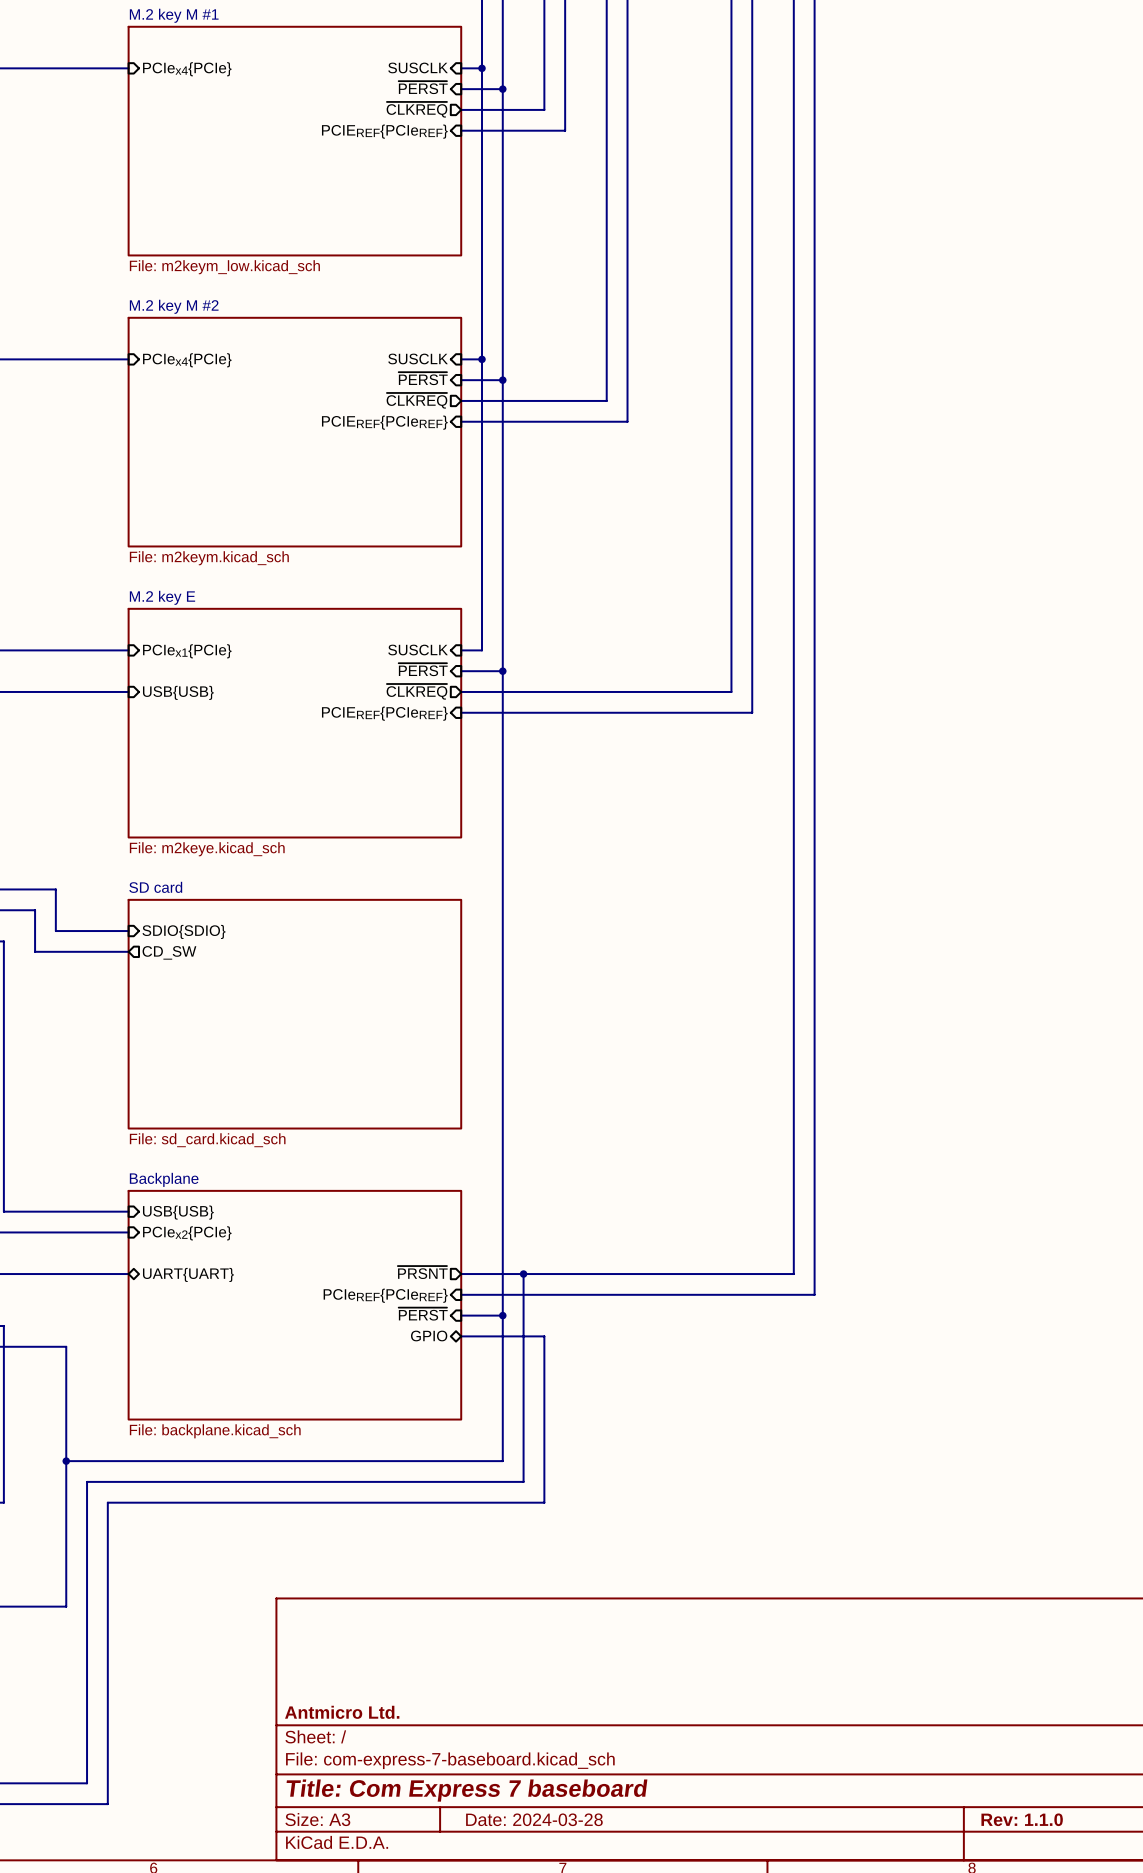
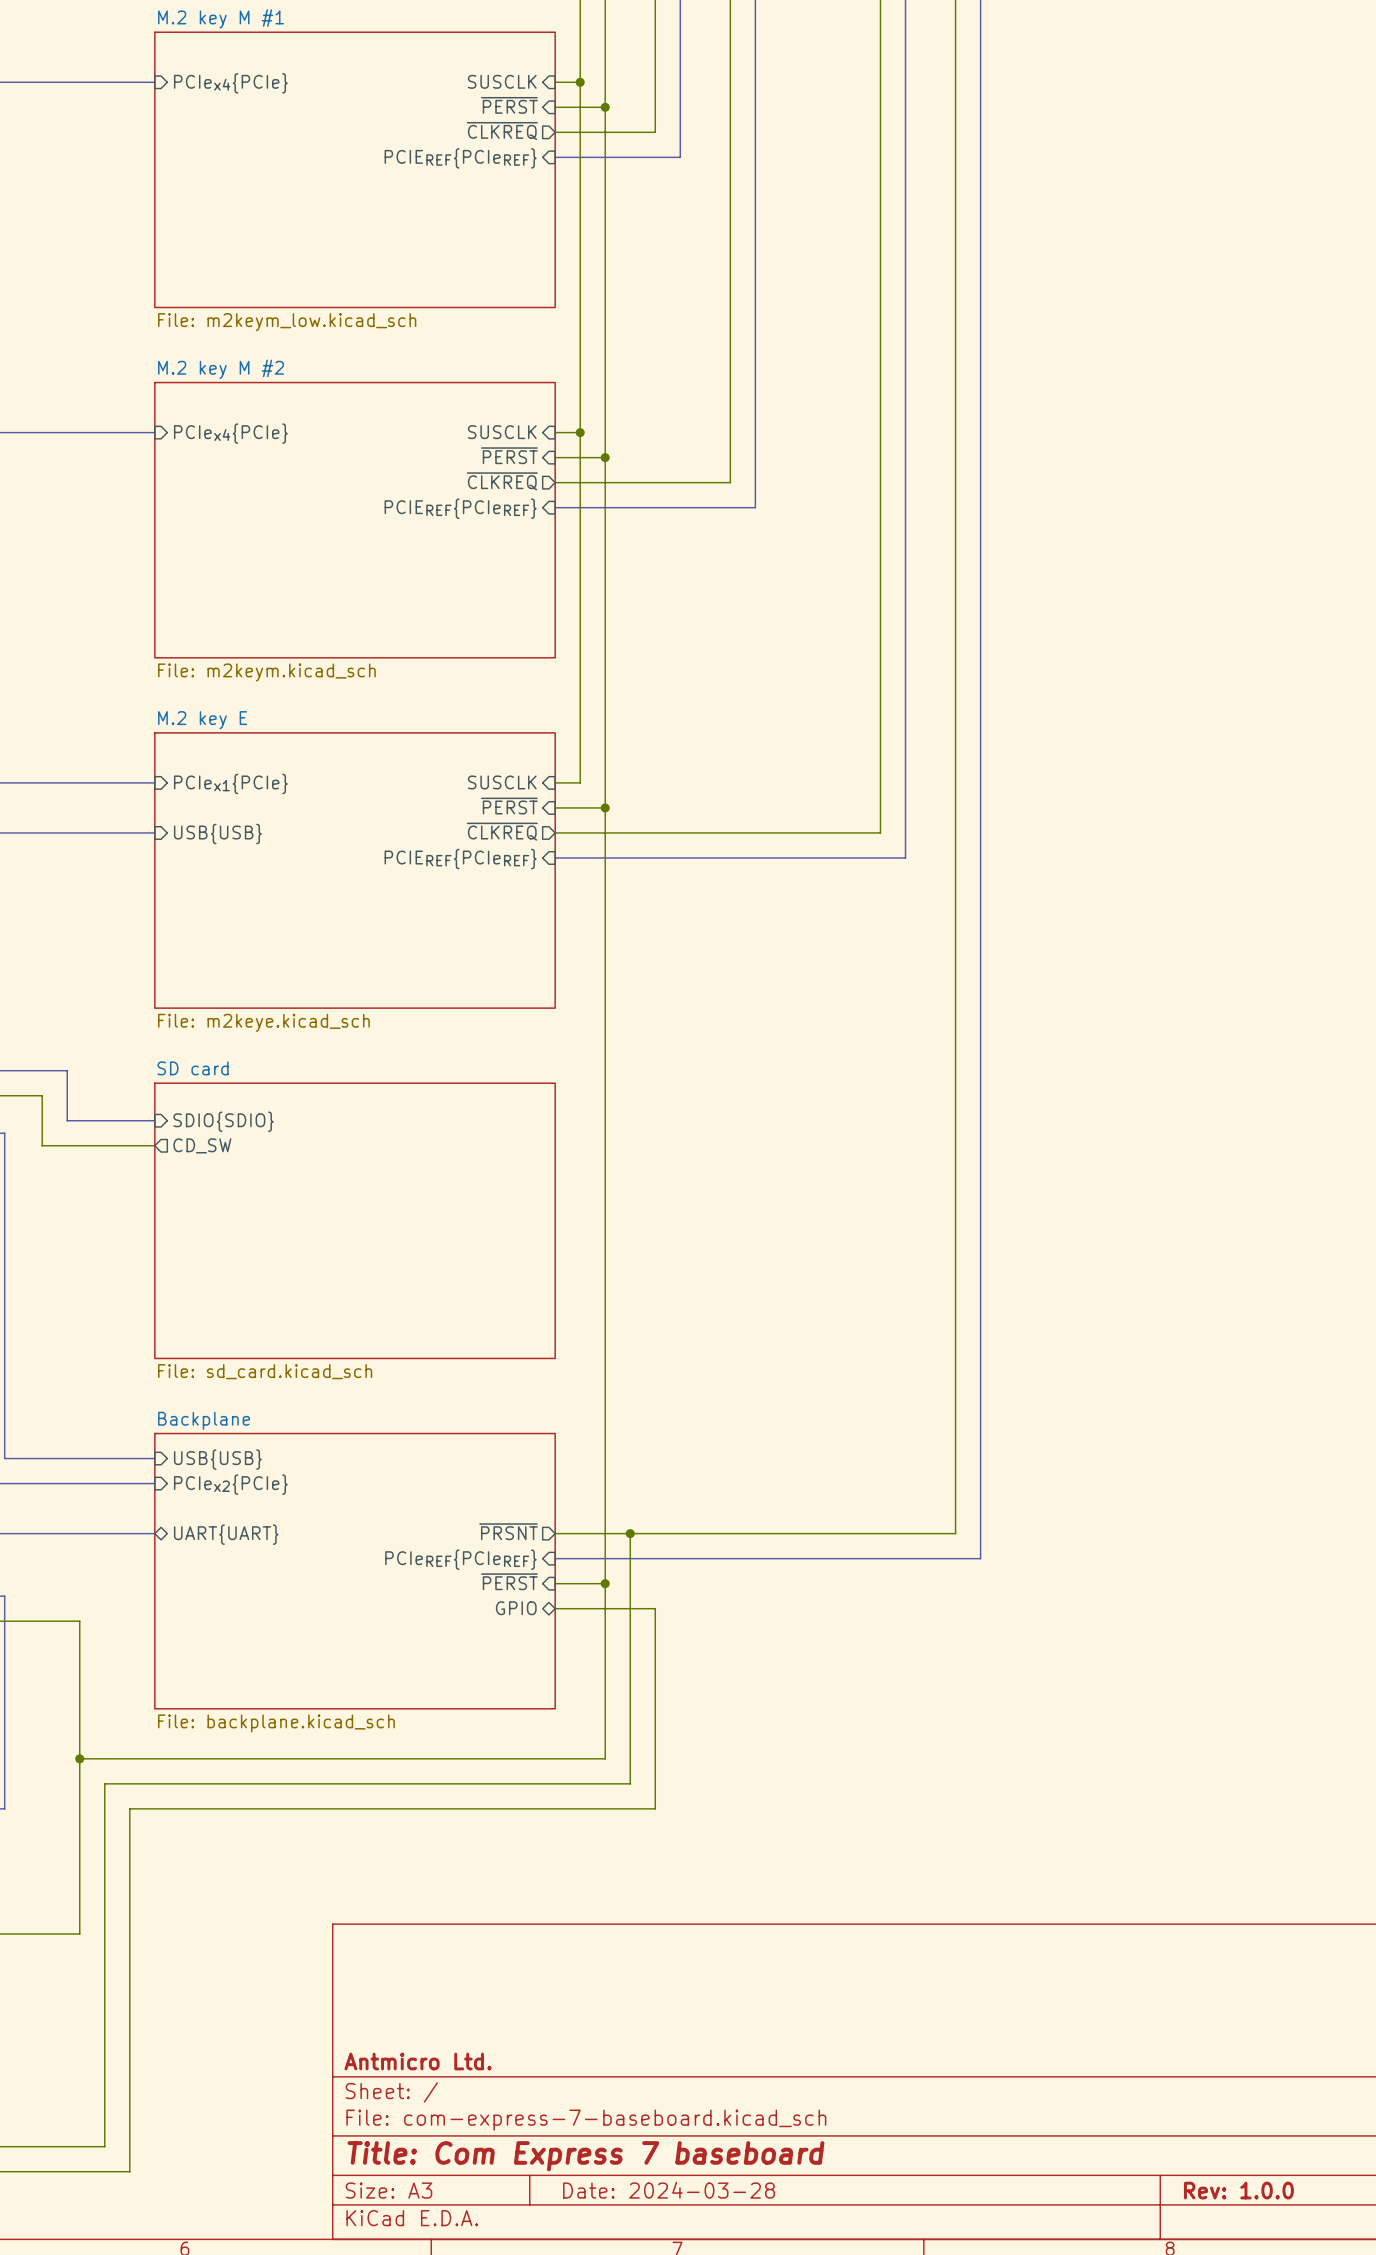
title block: Rev: 1.1.0 (1022, 1819) -> Rev: 1.0.0 (1238, 2190)

